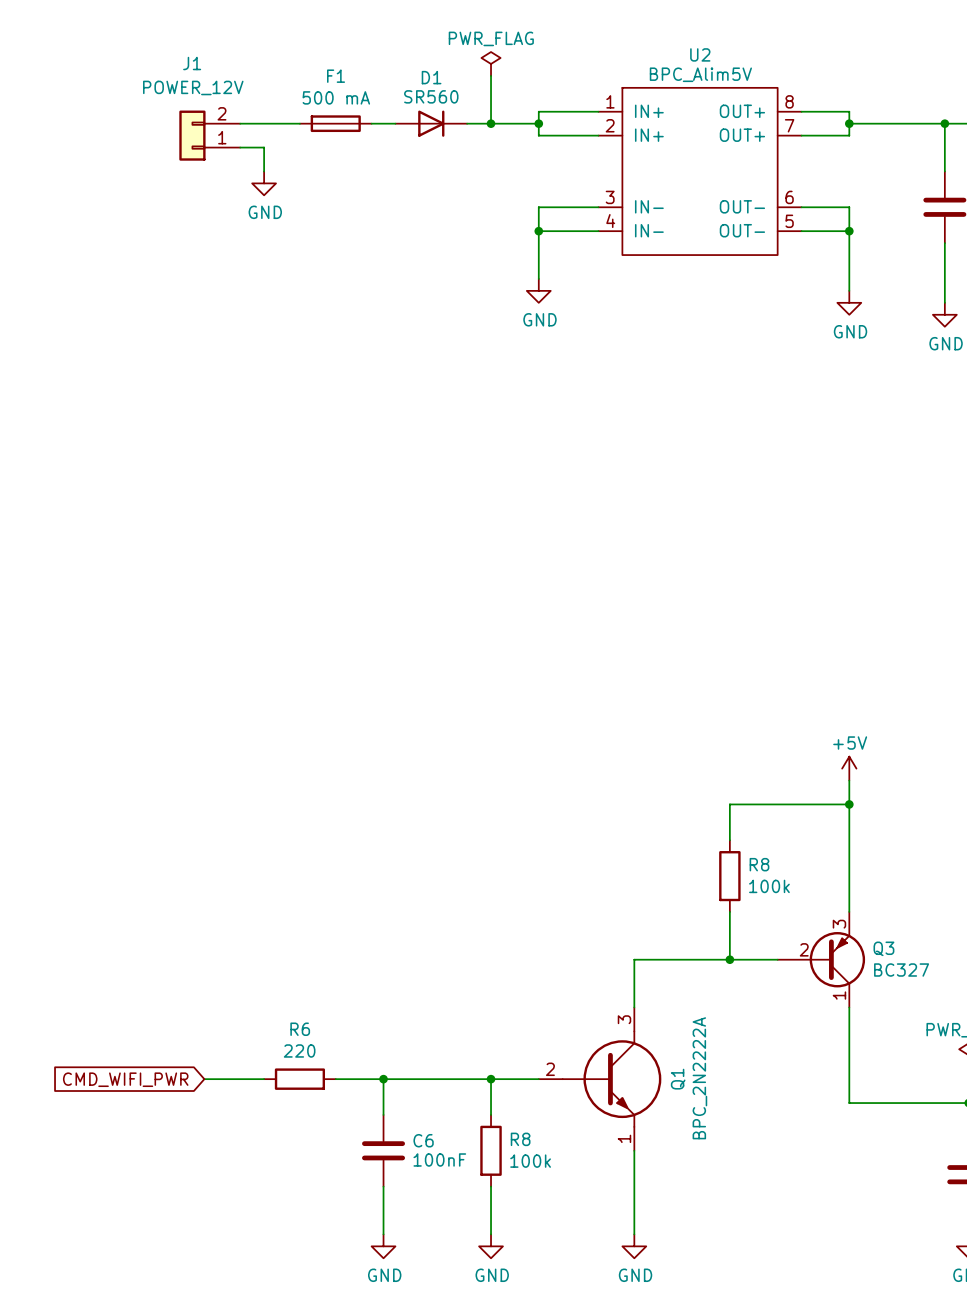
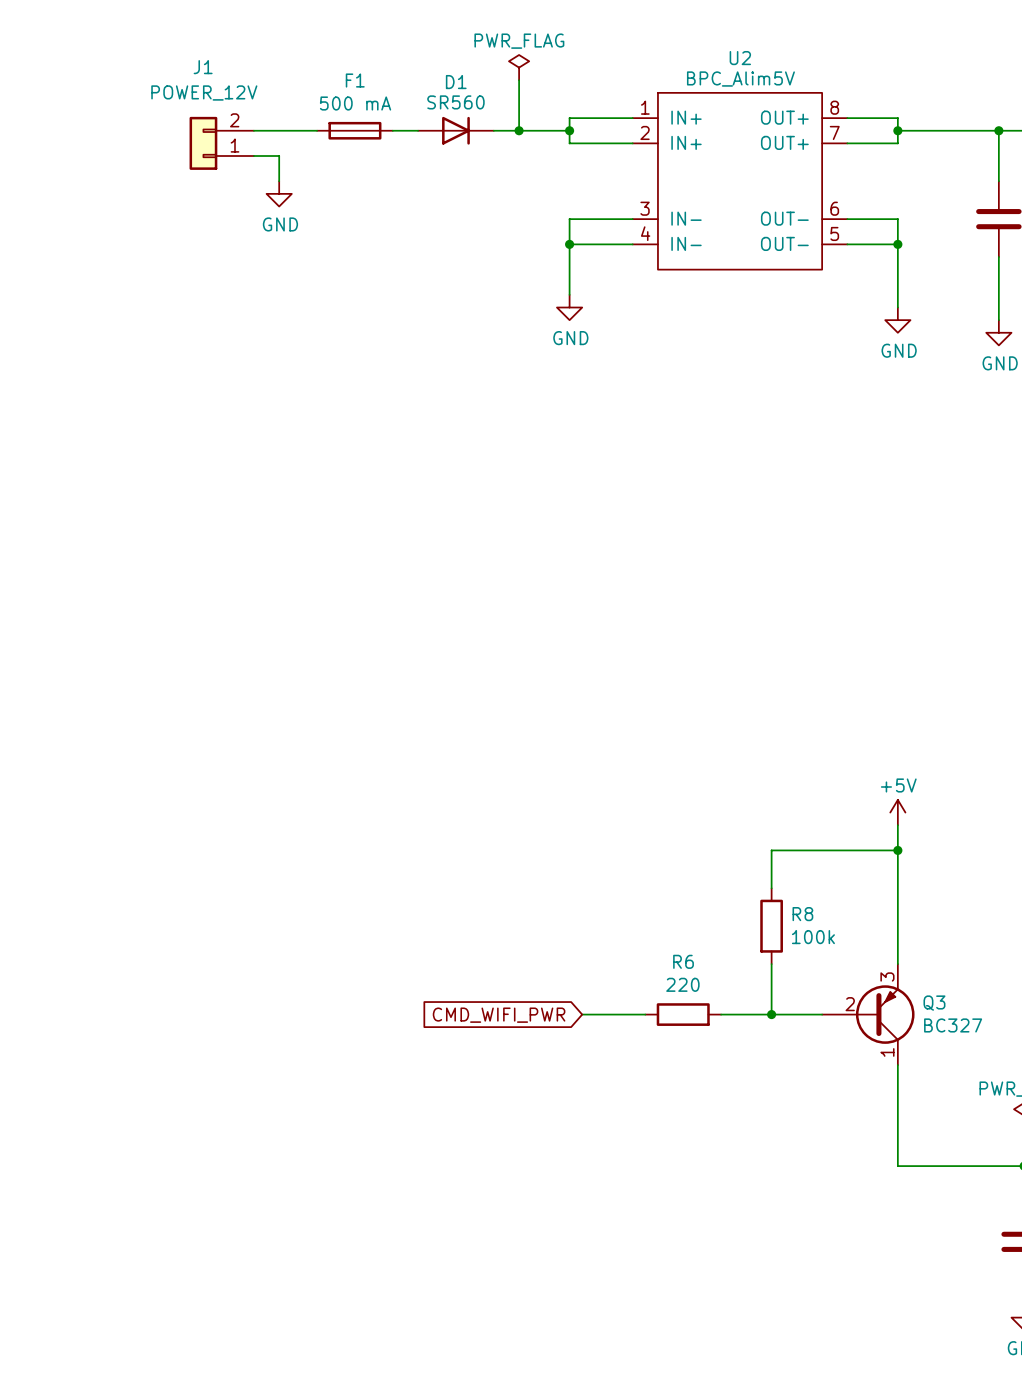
wire: none -> (582, 1014) (645, 1014)
wire: (682, 959) (634, 959) (634, 1007) -> none
global label: none -> CMD_WIFI_PWR (499, 1015)
global label: CMD_WIFI_PWR (125, 1079) -> none
wire: (204, 1079) (264, 1079) -> none
R6 position: (299, 1079) -> (683, 1014)
wire: (335, 1079) (538, 1079) -> none
wire: (383, 1079) (383, 1114) -> none
junction: (383, 1079) -> none
wire: (491, 1079) (491, 1114) -> none
junction: (491, 1079) -> none
Q1: BPC_2N2222A (600, 1079) -> none
C6: 100nF (383, 1150) -> none
R8: 100k (491, 1150) -> none
wire: (634, 1150) (634, 1234) -> none
wire: (383, 1186) (383, 1234) -> none
wire: (491, 1186) (491, 1234) -> none
power symbol: GND (383, 1246) -> none
power symbol: GND (491, 1246) -> none
power symbol: GND (634, 1246) -> none

